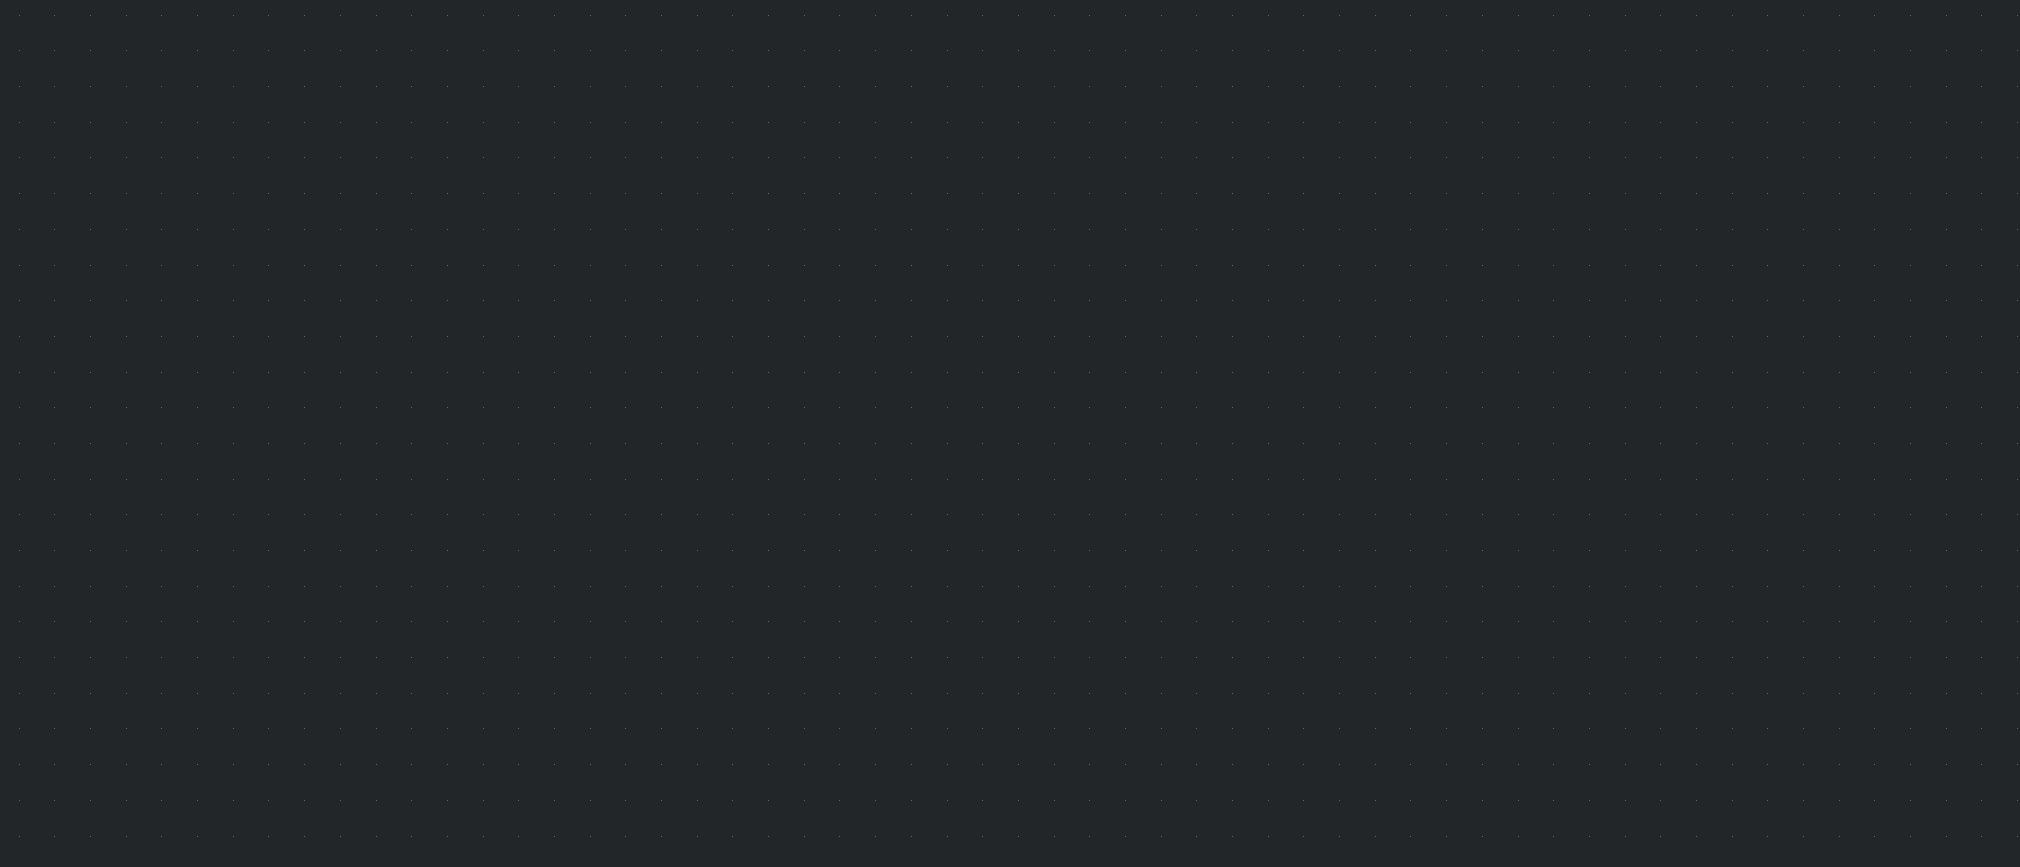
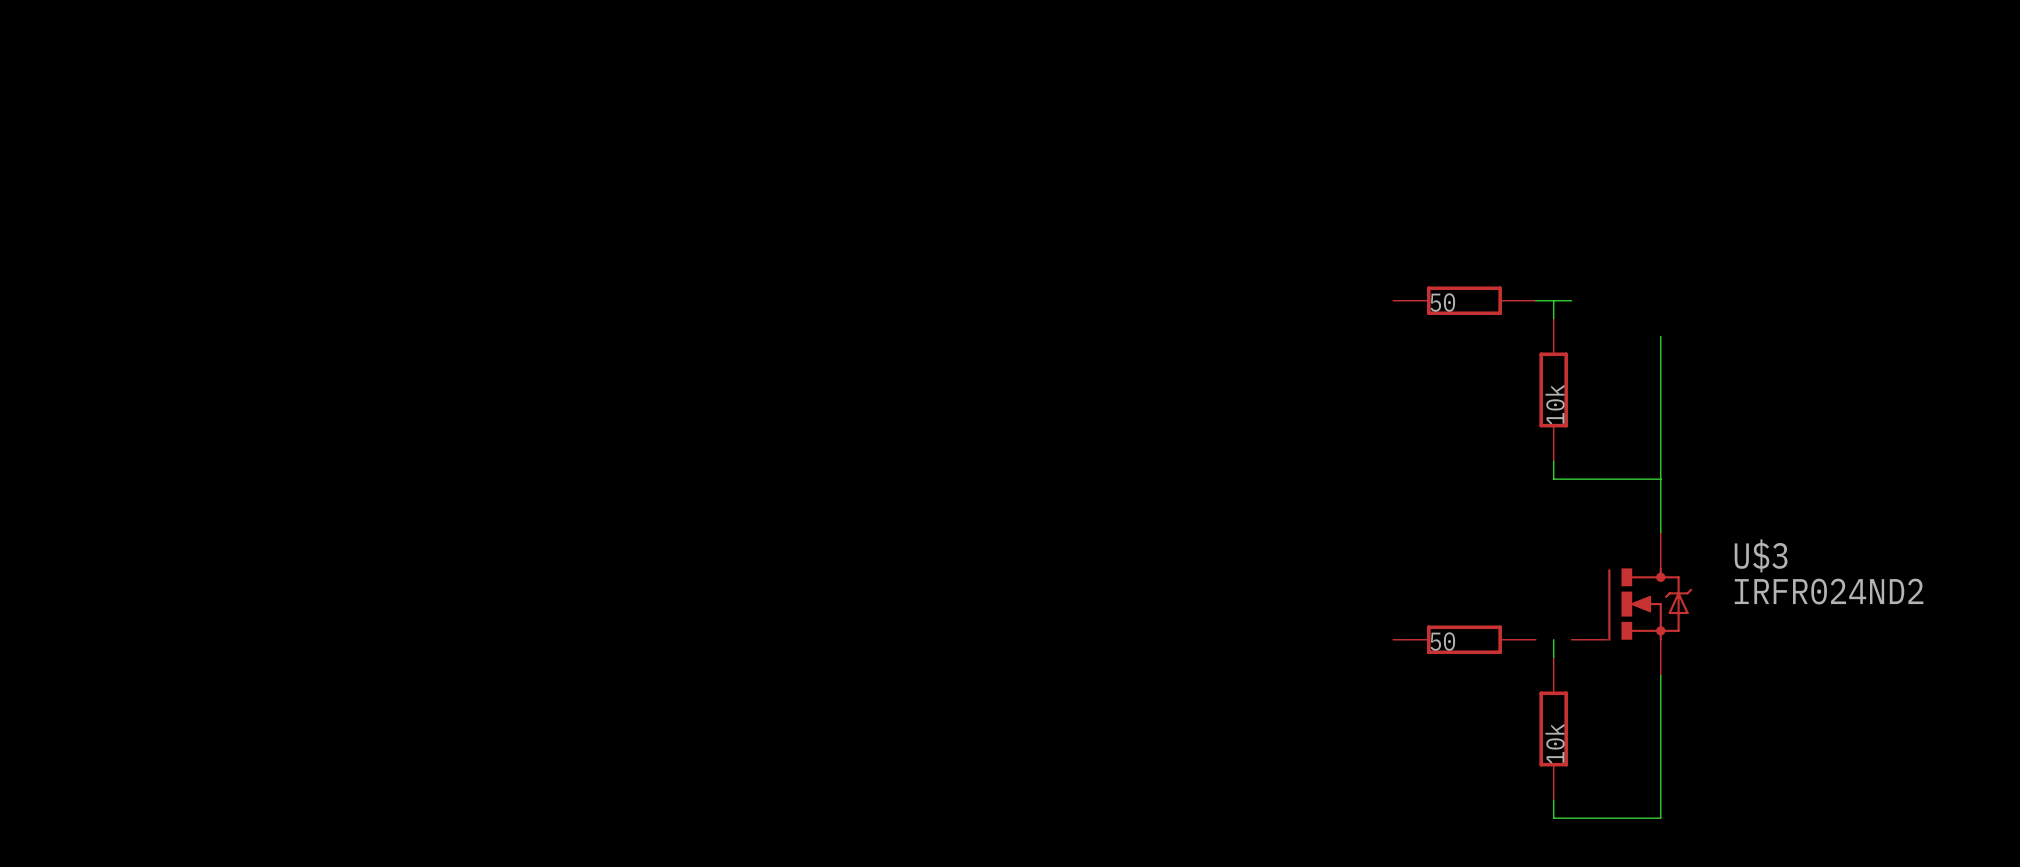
part: none -> 50 (1464, 300)
wire: none -> (1535, 300) (1571, 300)
wire: none -> (1553, 300) (1553, 318)
wire: none -> (1660, 336) (1660, 532)
part: none -> 10k (1553, 389)
wire: none -> (1553, 461) (1553, 479) (1660, 479)
U$3: none -> IRFR024ND2 (1631, 604)
part: none -> 50 (1464, 639)
wire: none -> (1553, 639) (1553, 657)
wire: none -> (1660, 675) (1660, 818) (1553, 818) (1553, 800)
part: none -> 10k (1553, 728)

